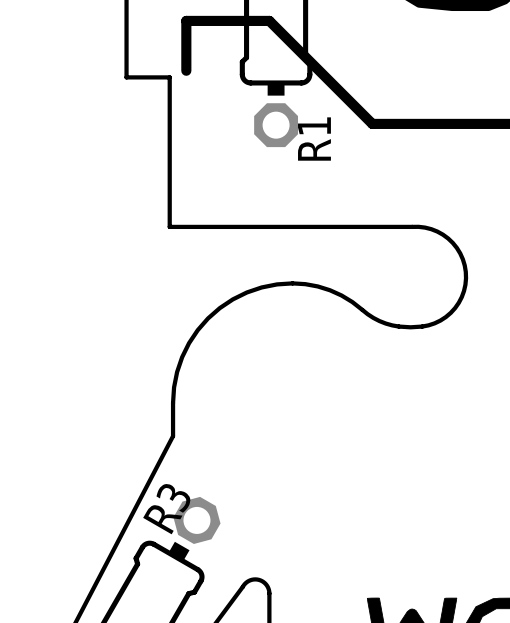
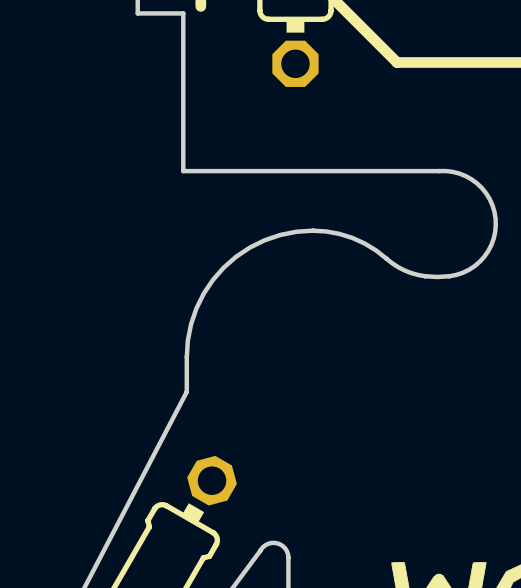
R1 name: R1 (314, 139) -> none
R3 name: R3 (167, 508) -> none

